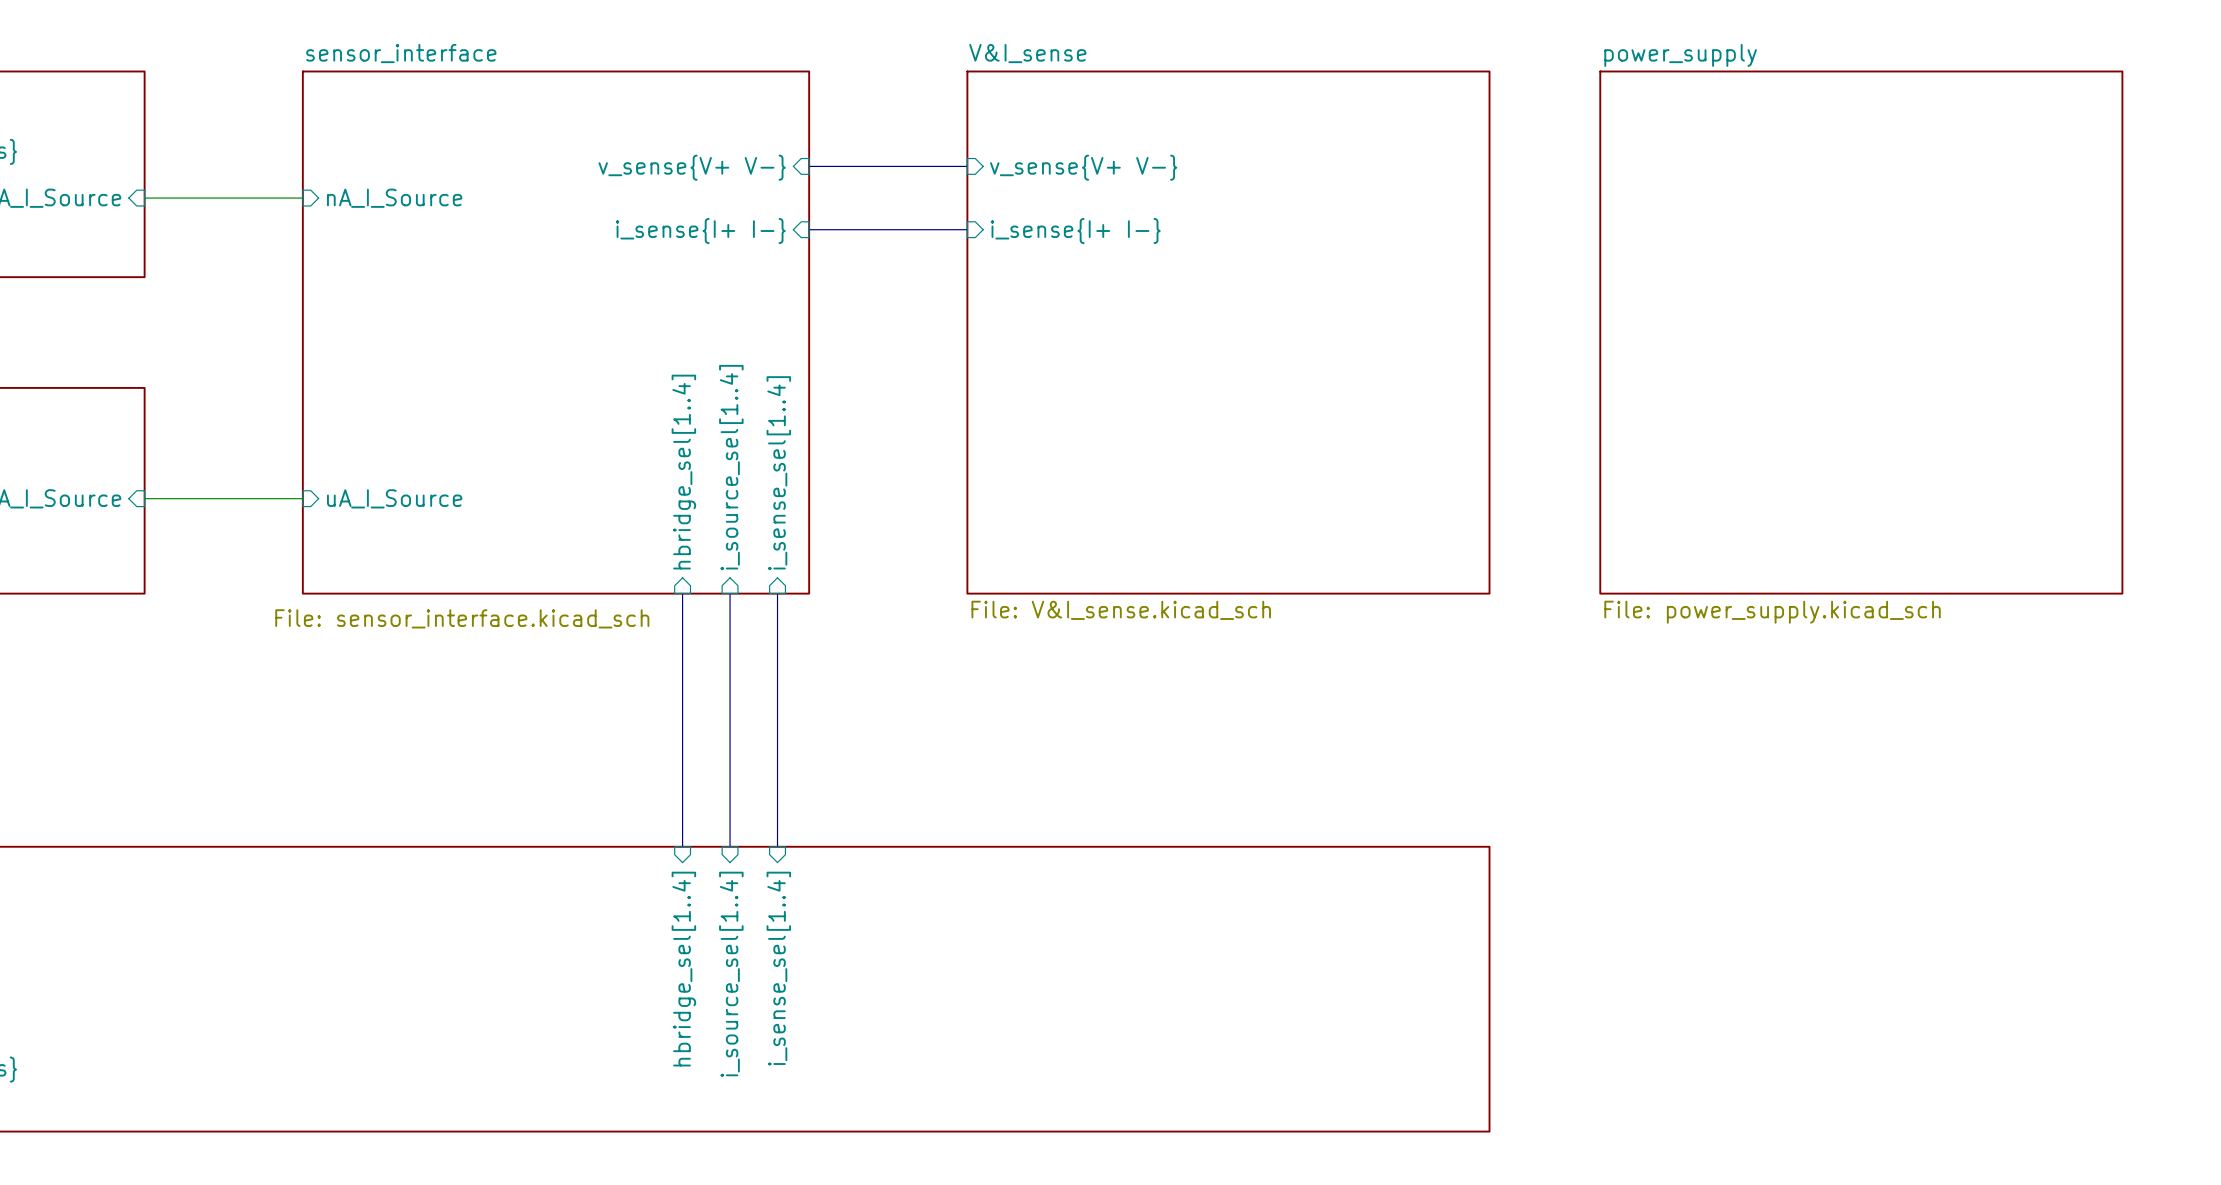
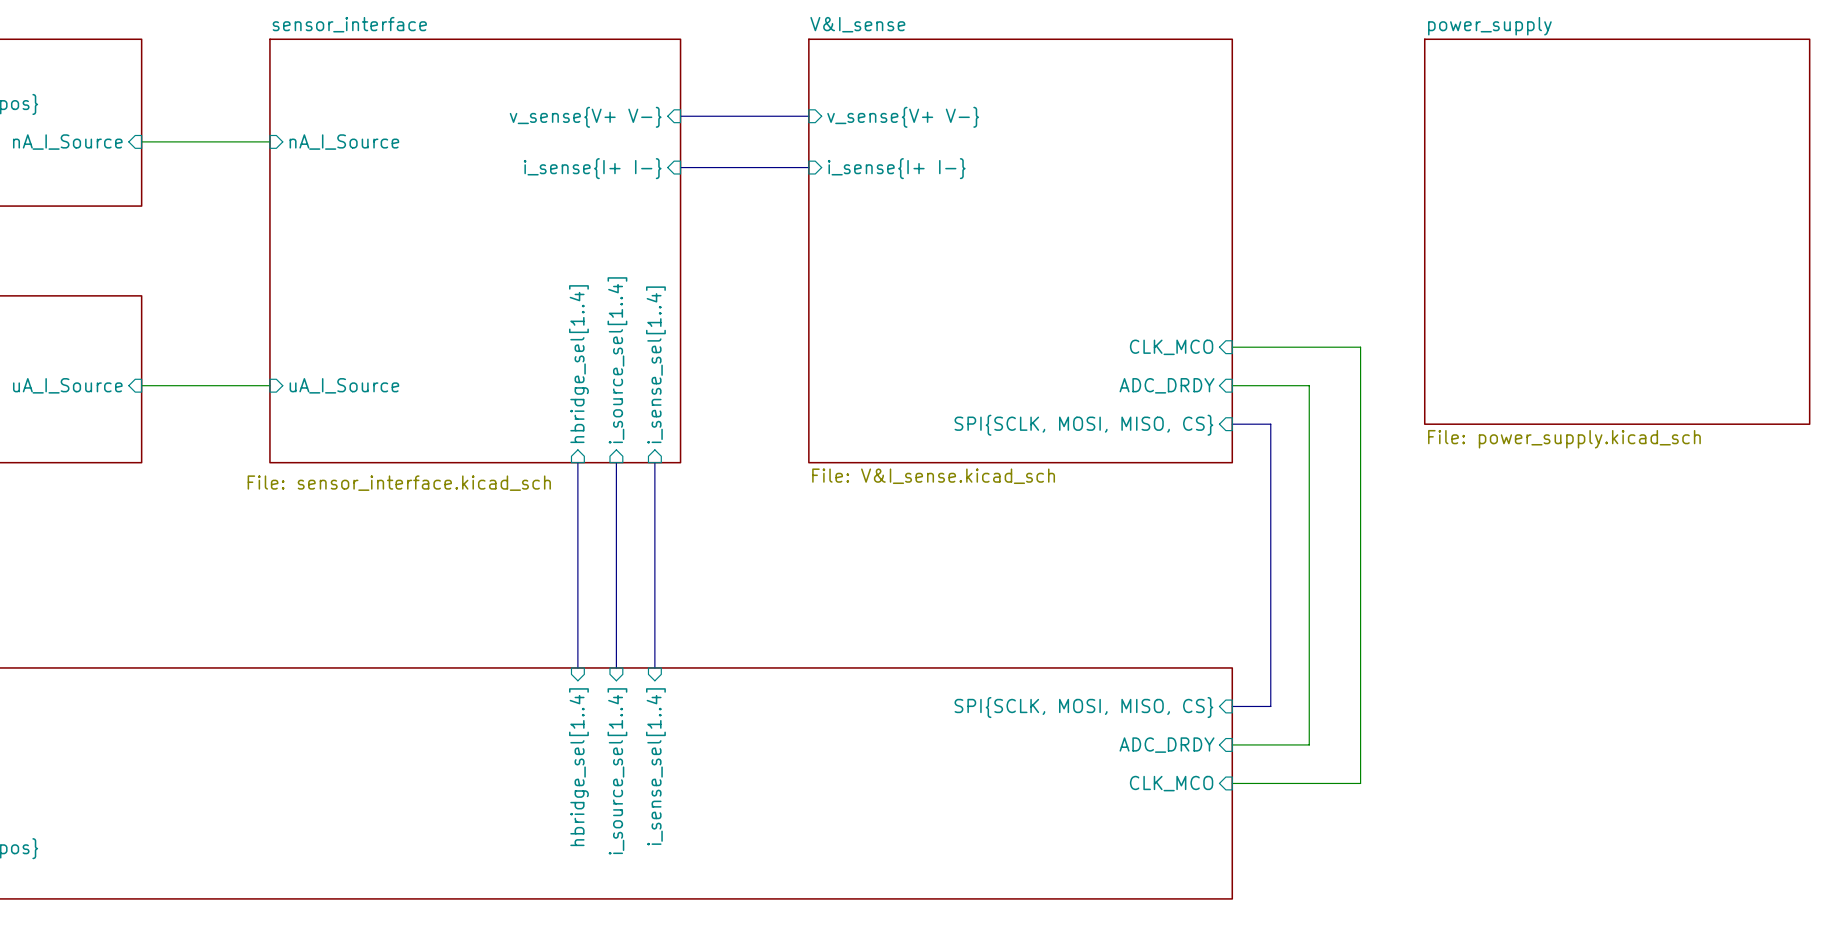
sheet power_supply: none -> File: power_supply.kicad_sch (1617, 231)
sheet power_supply: File: power_supply.kicad_sch (1861, 332) -> none
sheet pin: none -> CLK_MCO (1171, 347)
wire: none -> (1232, 347) (1360, 347) (1360, 783) (1232, 783)
sheet pin: none -> ADC_DRDY (1167, 385)
wire: none -> (1232, 385) (1309, 385) (1309, 744) (1232, 744)
bus: none -> (1232, 424) (1270, 424) (1270, 706) (1232, 706)
sheet pin: none -> SPI{SCLK, MOSI, MISO, CS} (1083, 425)
sheet pin: none -> SPI{SCLK, MOSI, MISO, CS} (1083, 707)
sheet pin: none -> ADC_DRDY (1167, 745)
sheet pin: none -> CLK_MCO (1171, 783)

